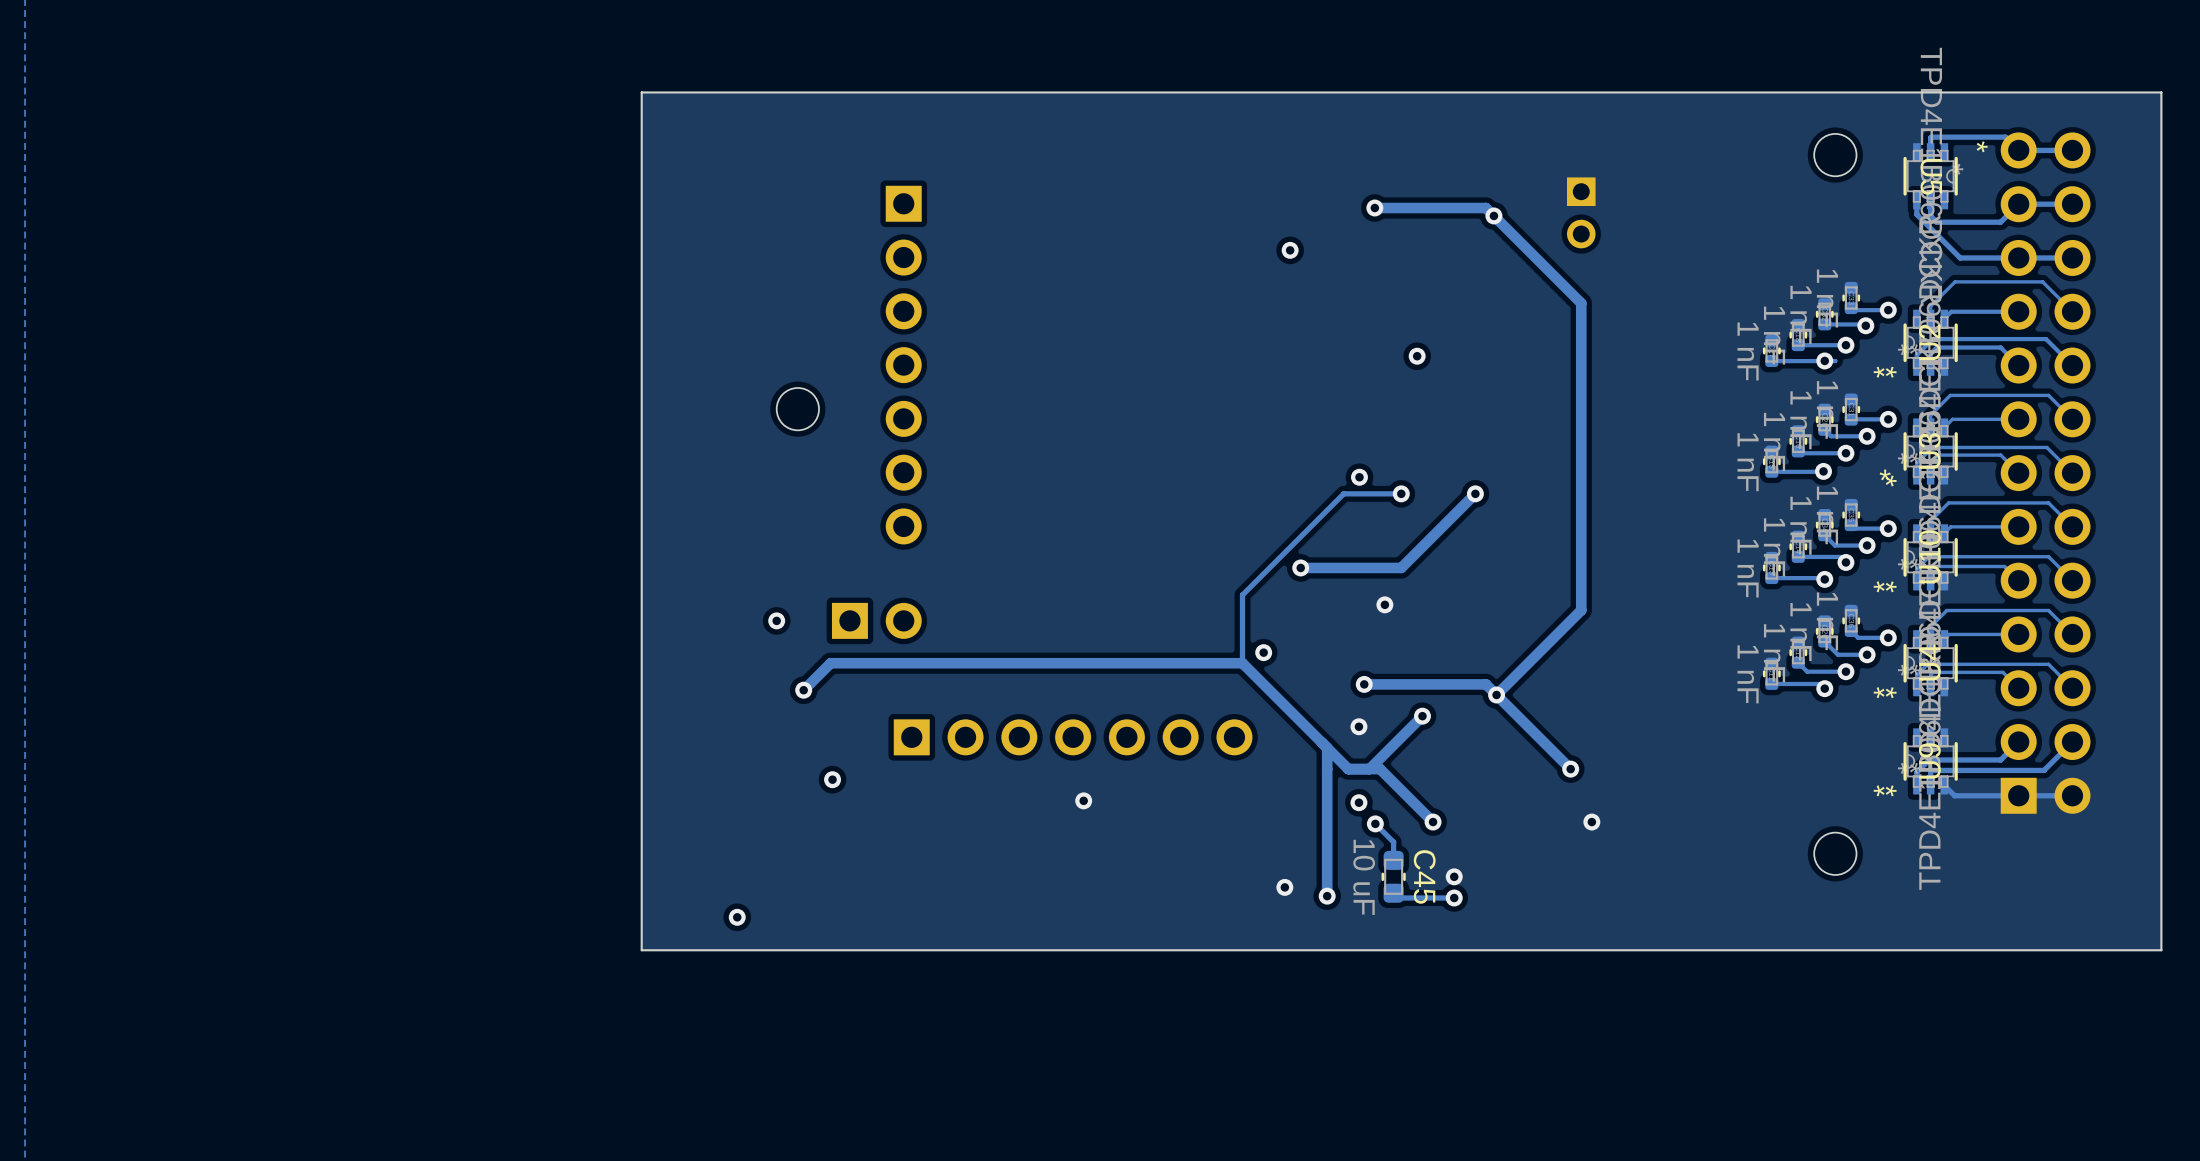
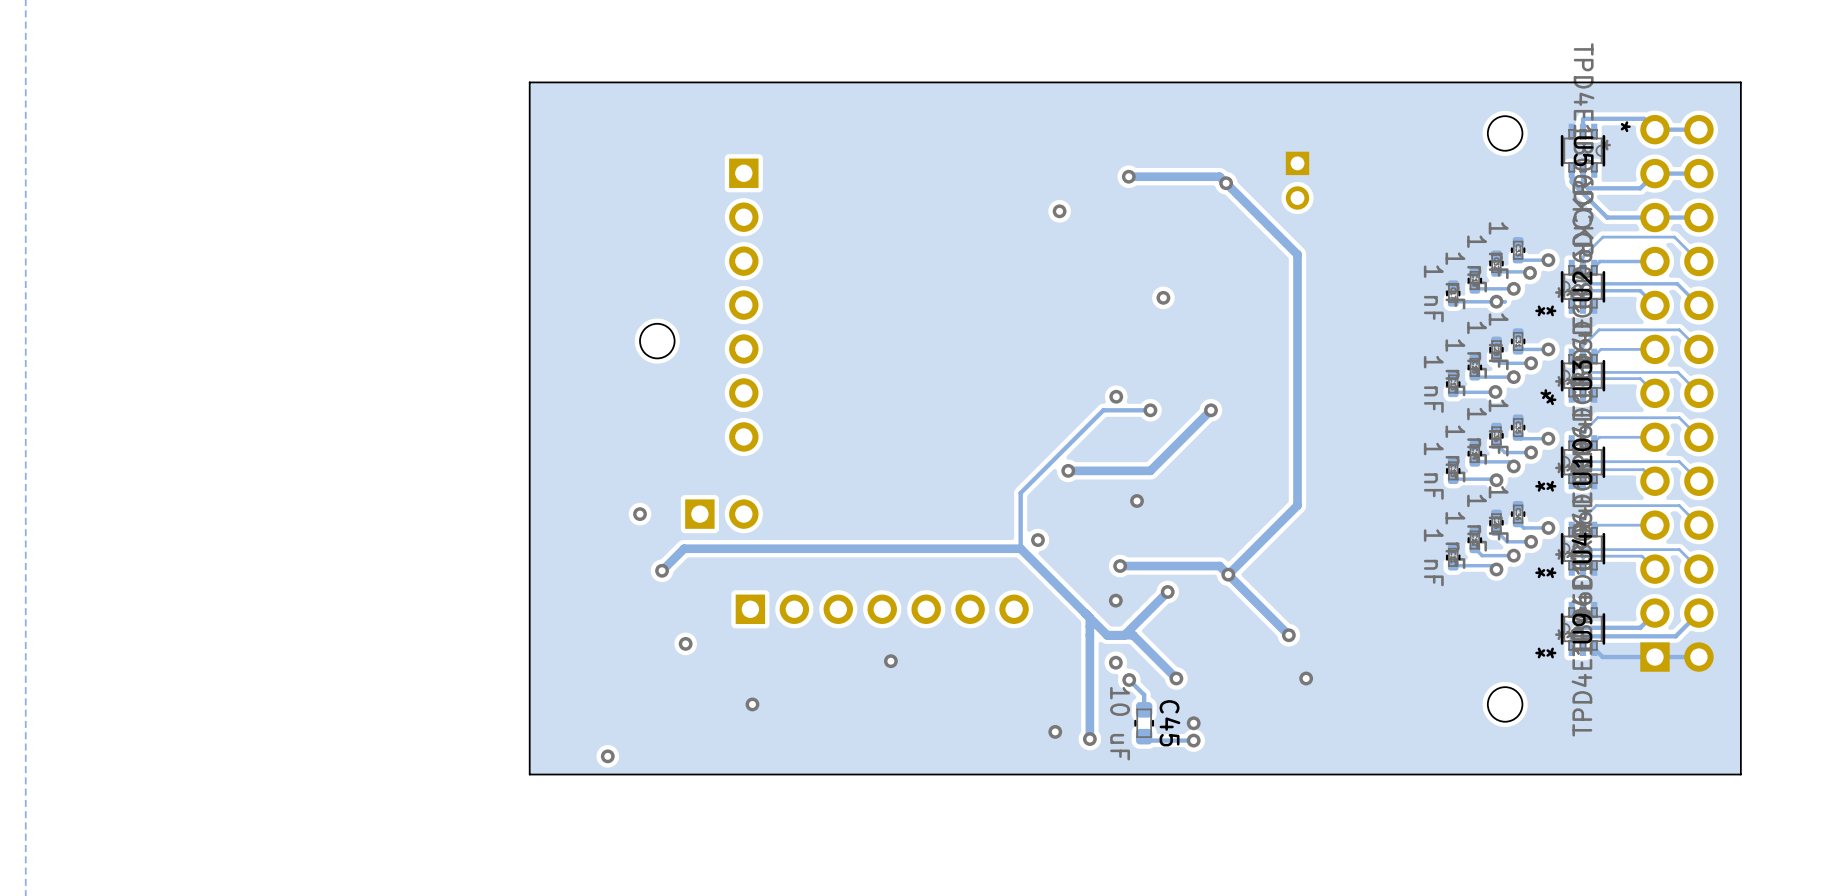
board edge: (641, 92) (2161, 92) (2161, 950) (641, 950) (641, 939) -> (529, 82) (1740, 82) (1740, 774) (529, 774)
via: none -> (752, 704)

